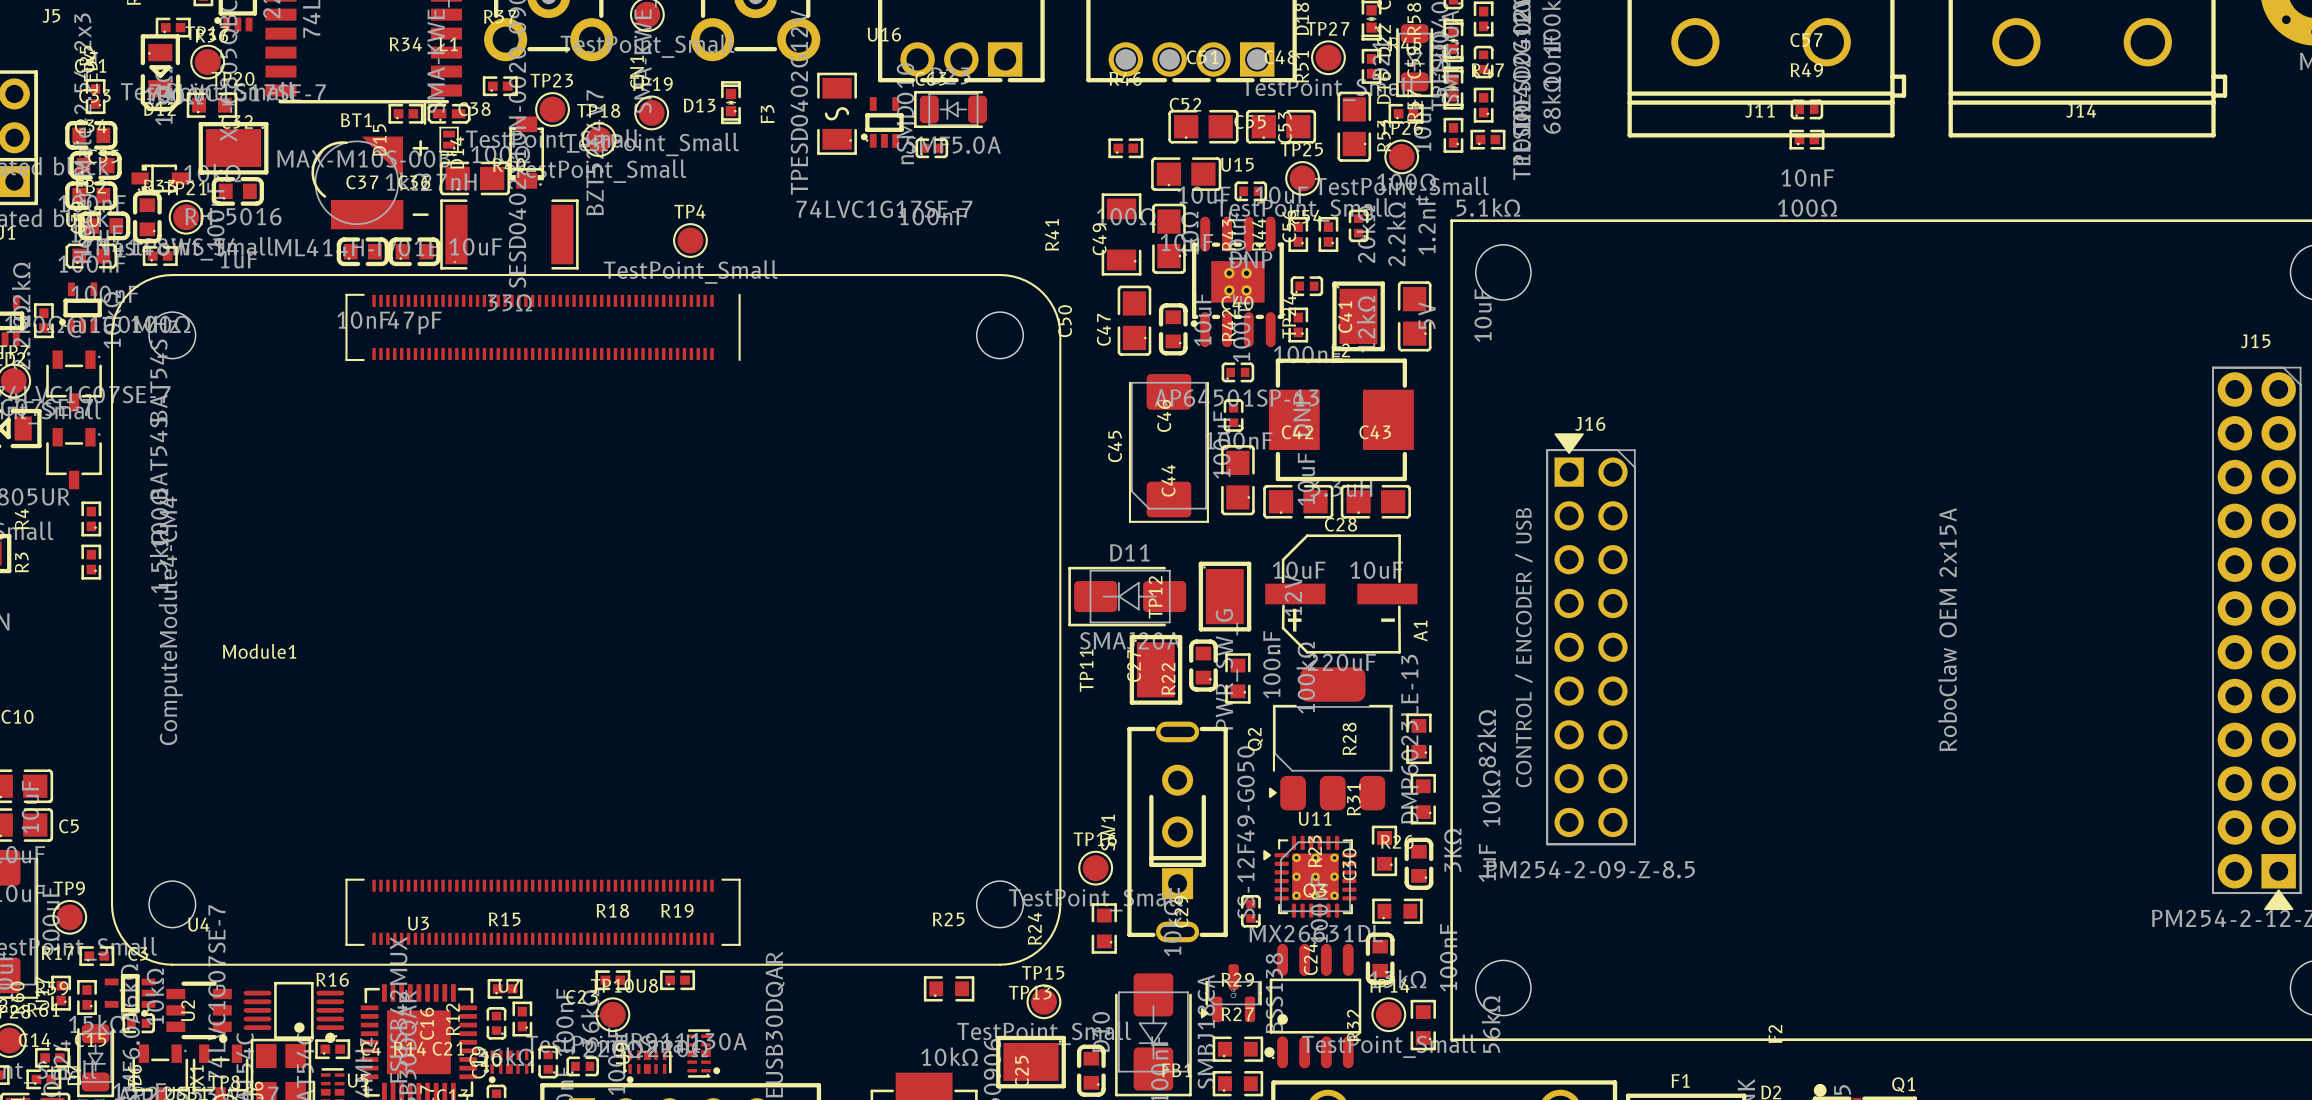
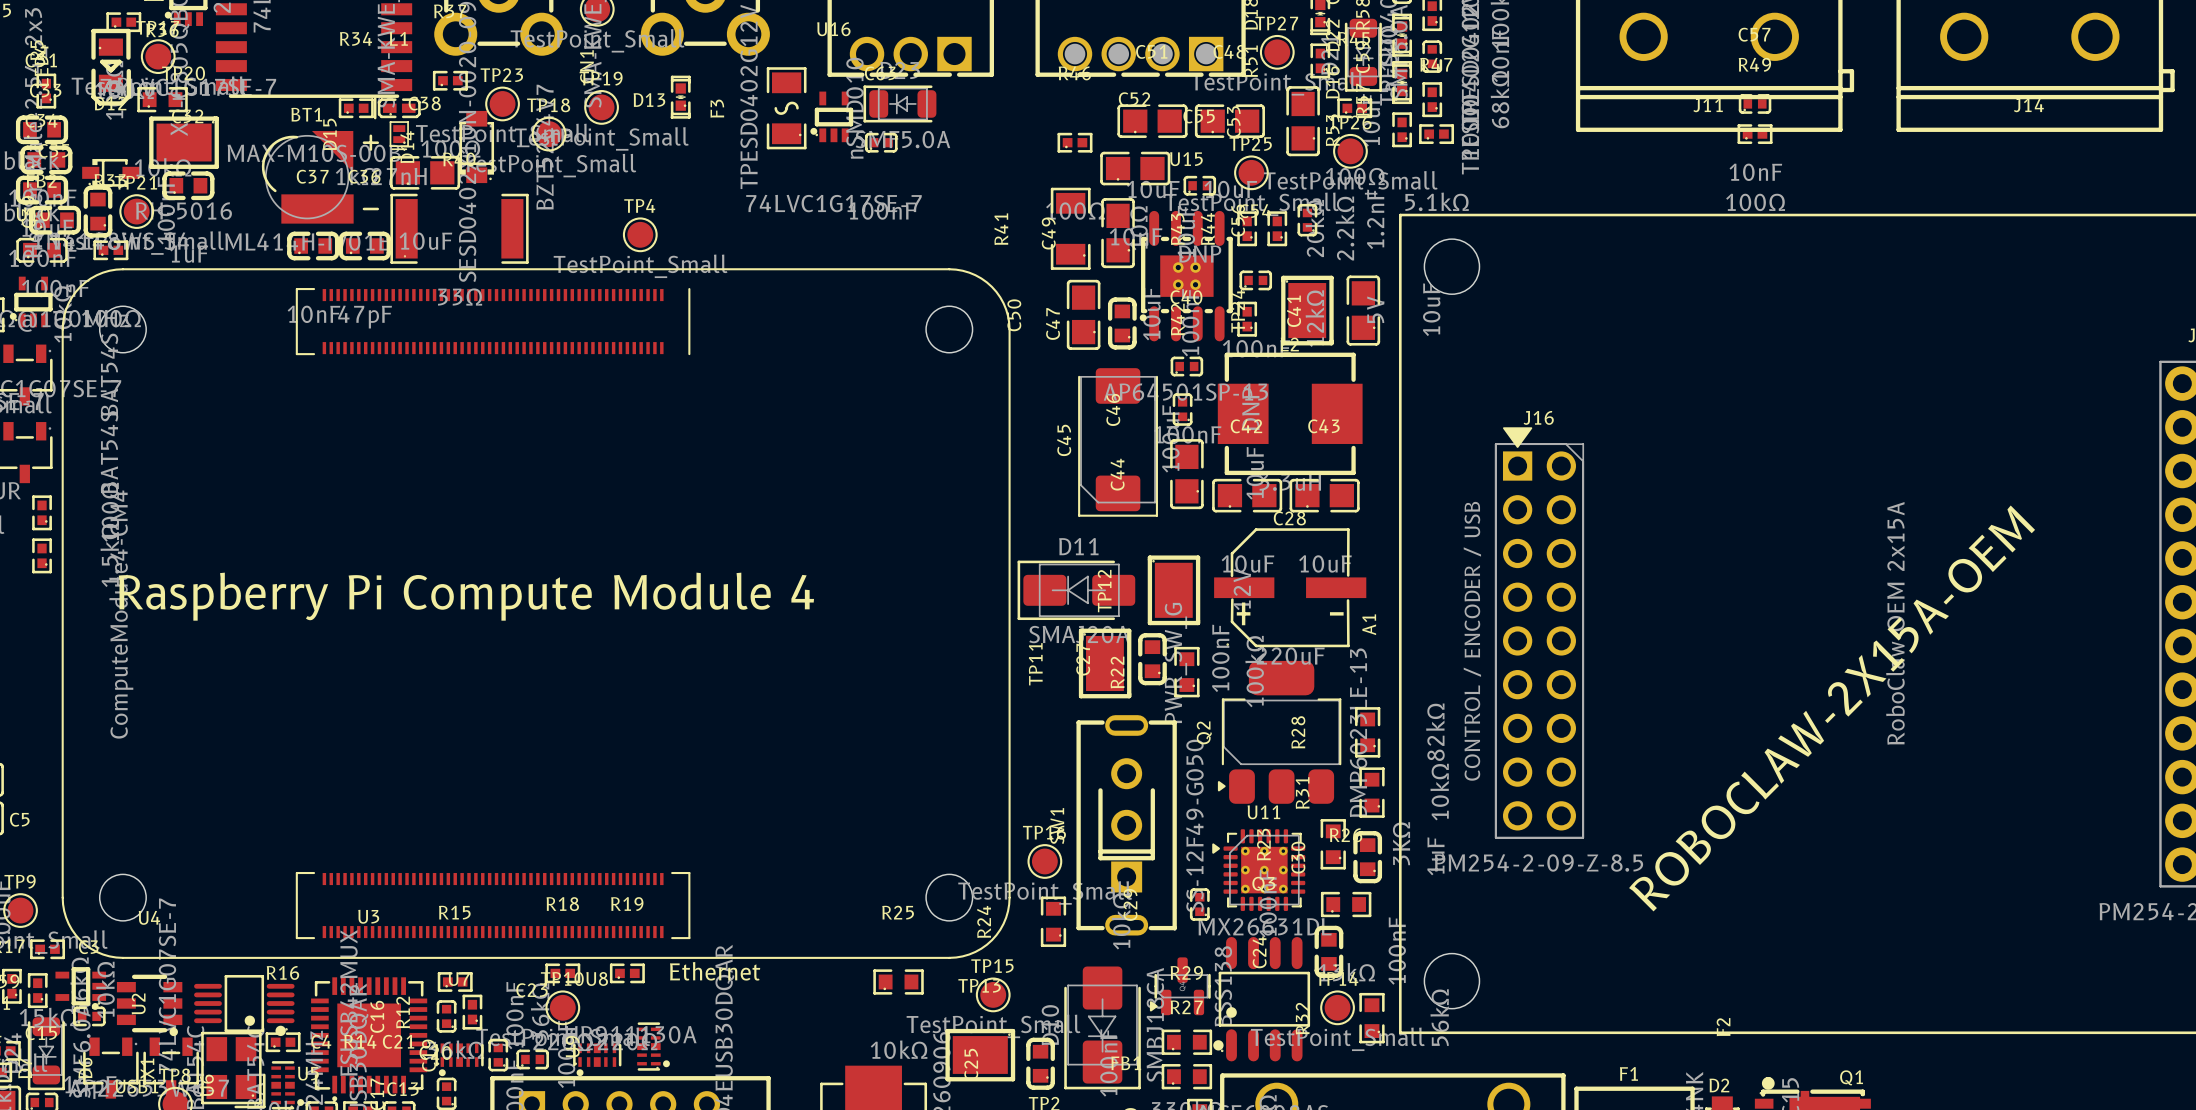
text: none -> Raspberry Pi Compute Module 4 (466, 596)
Module1 name: Module1 (259, 651) -> none
text: none -> ROBOCLAW-2X15A-OEM (1832, 708)
text: none -> Ethernet (715, 971)

